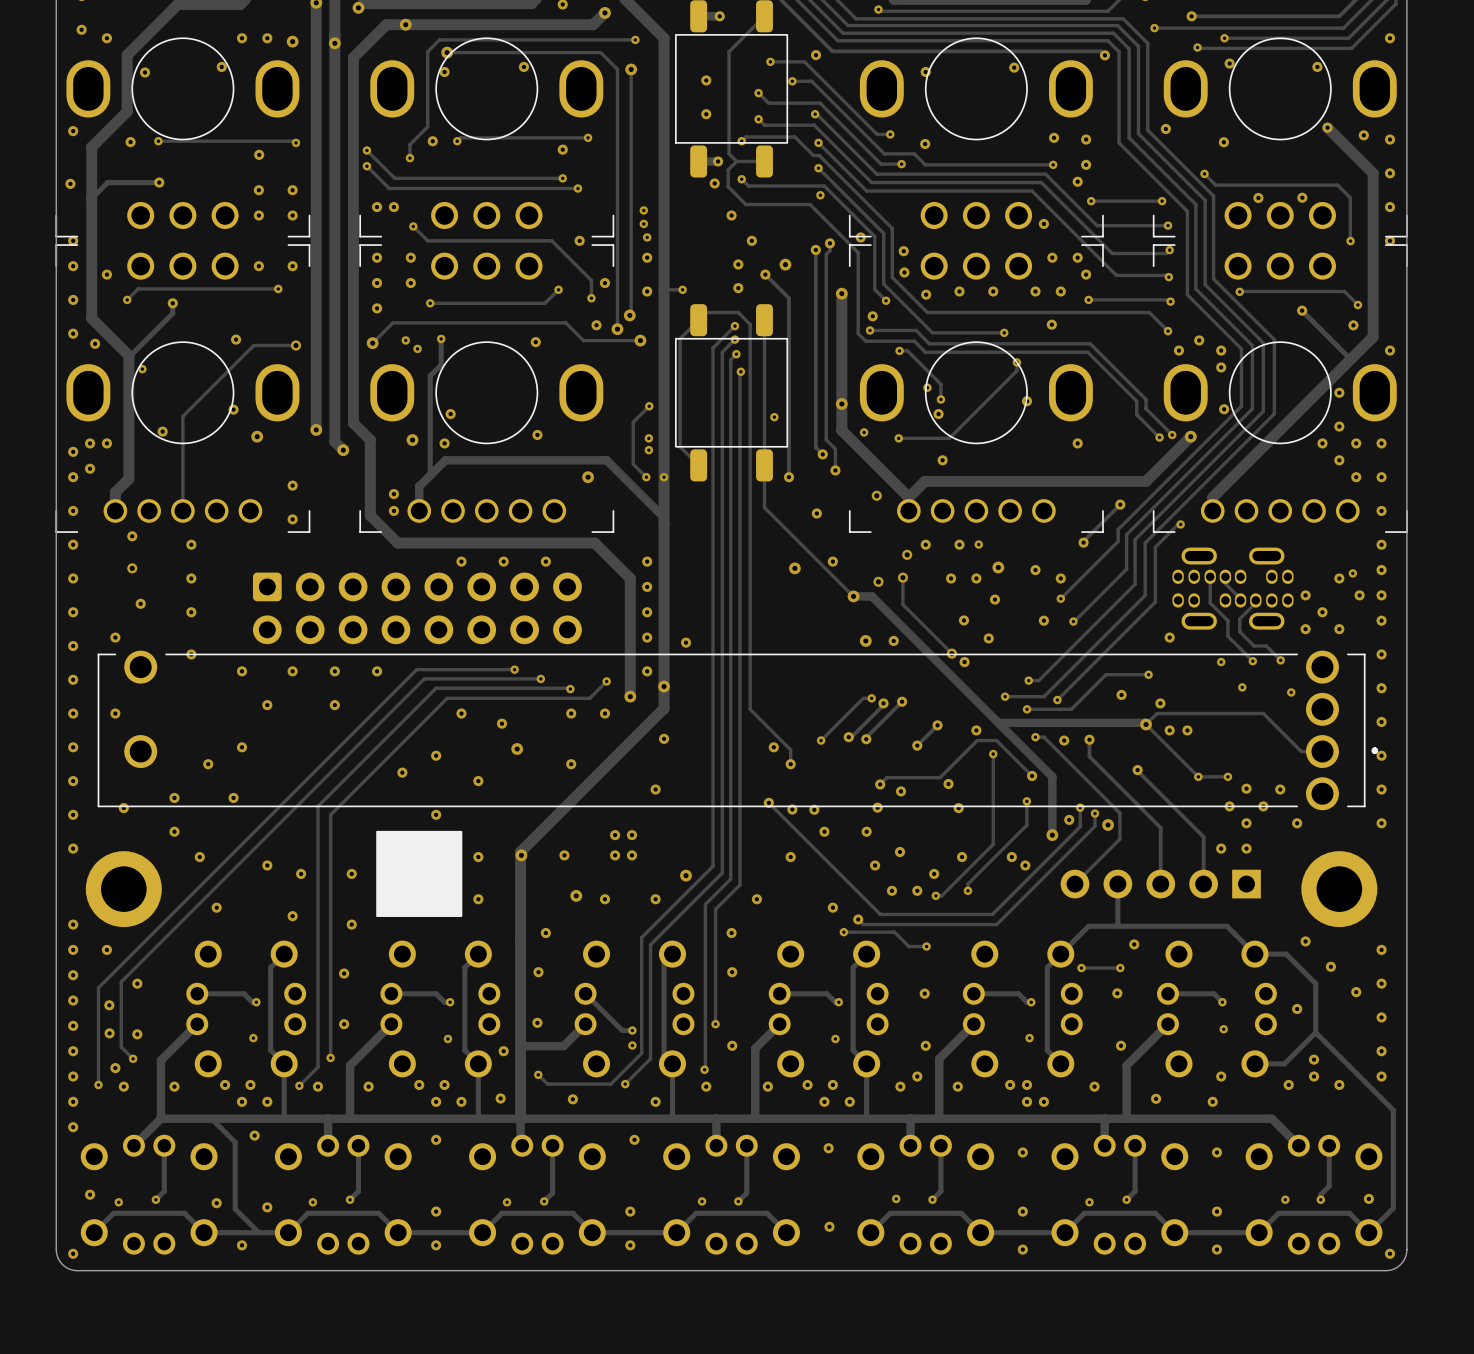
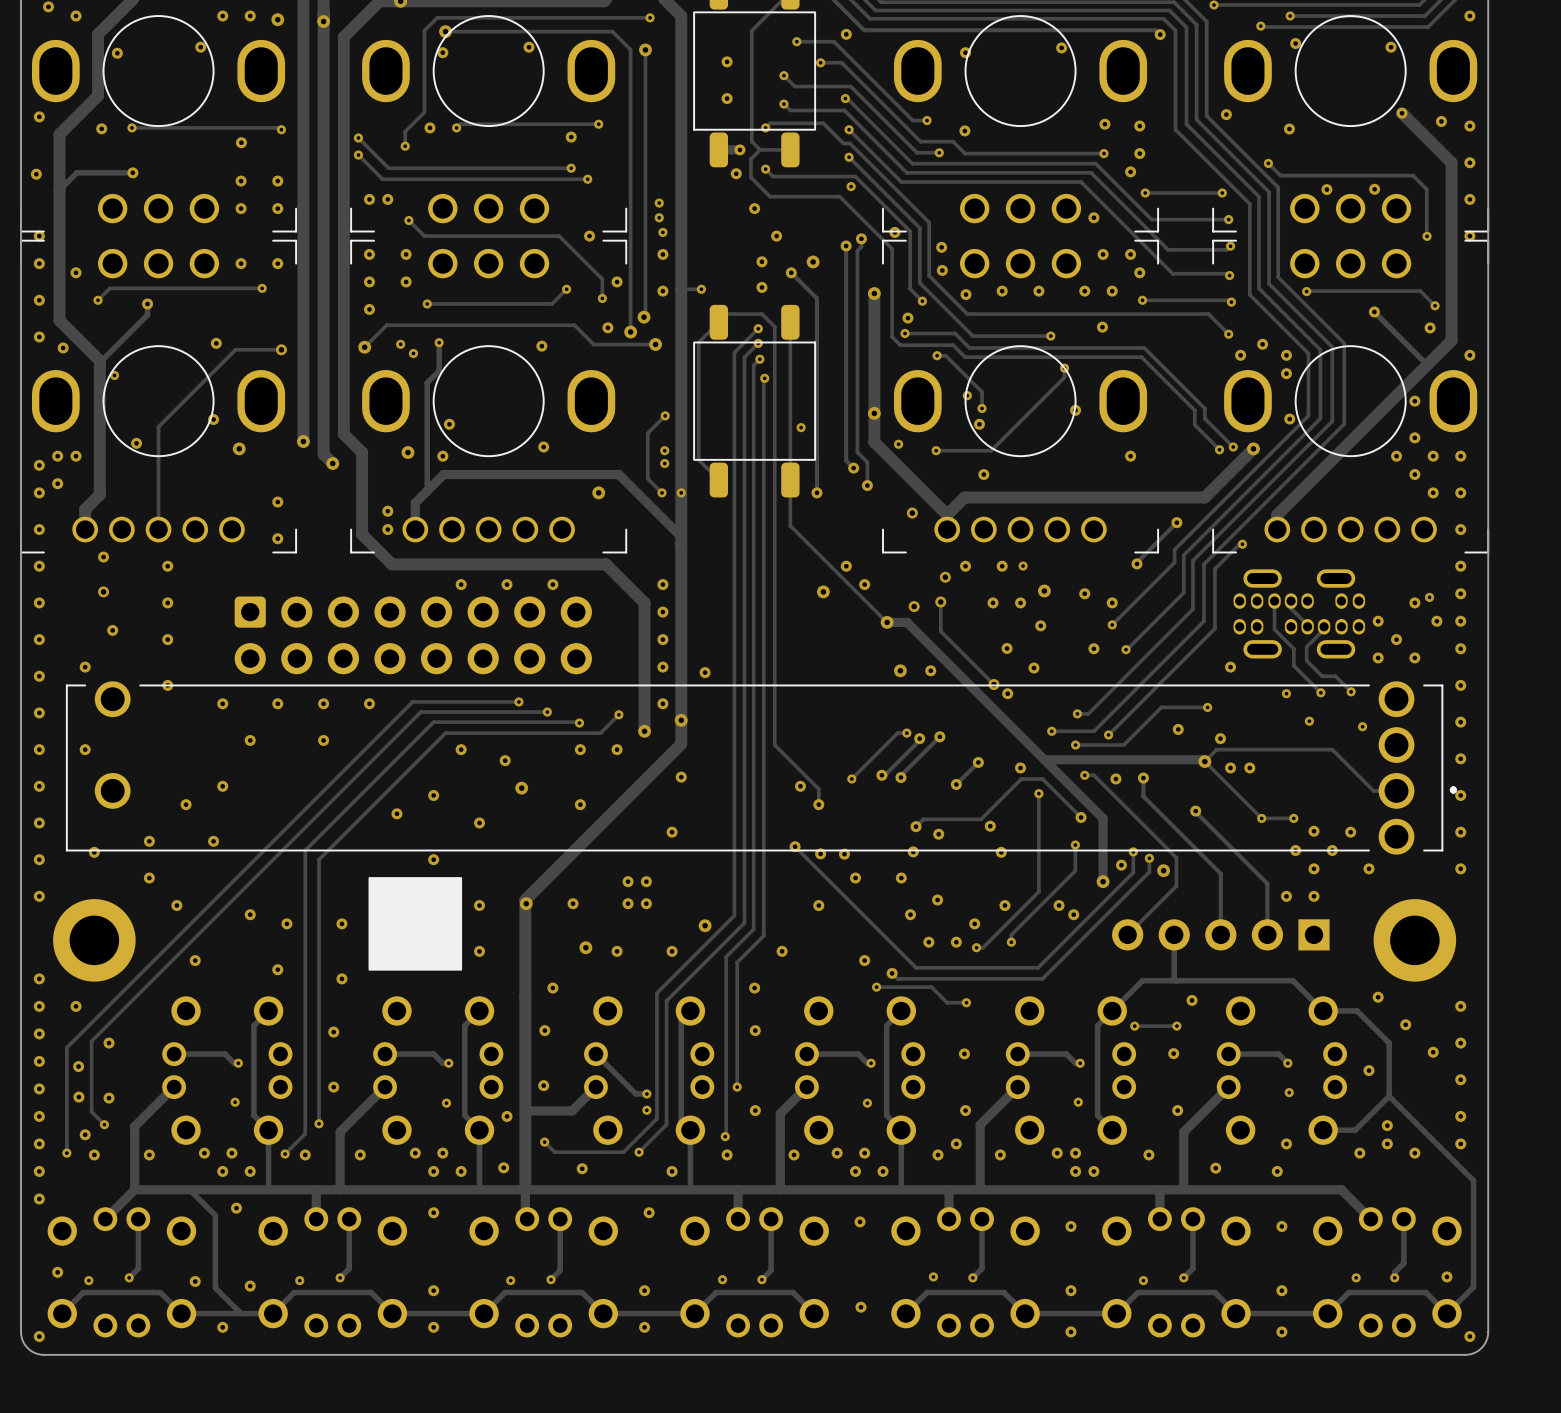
via position: (816, 513) -> (846, 566)

